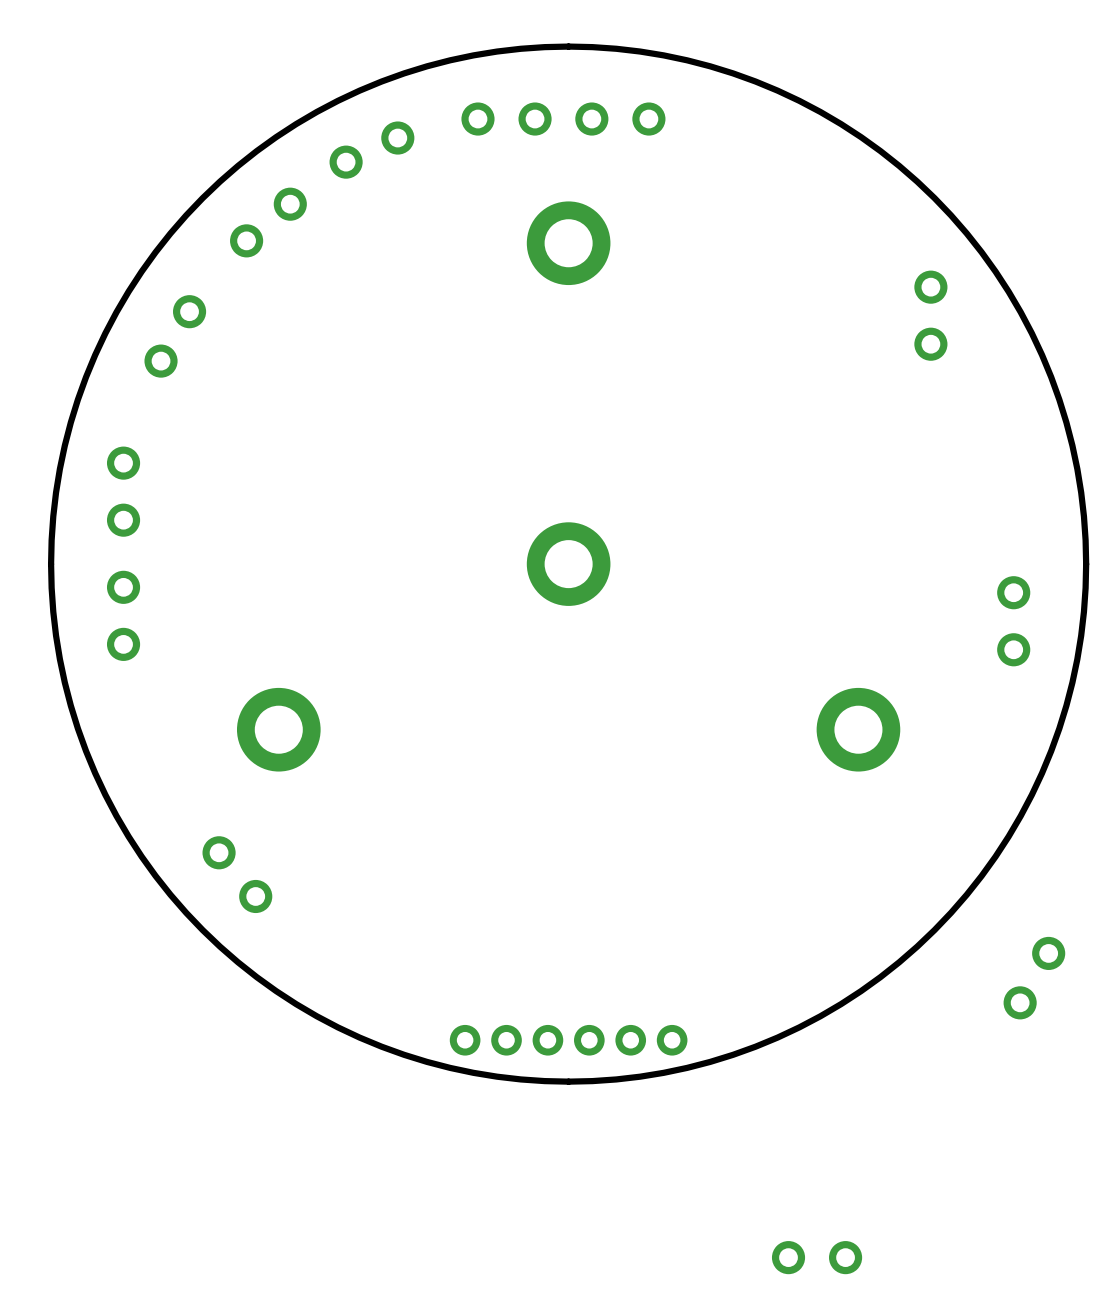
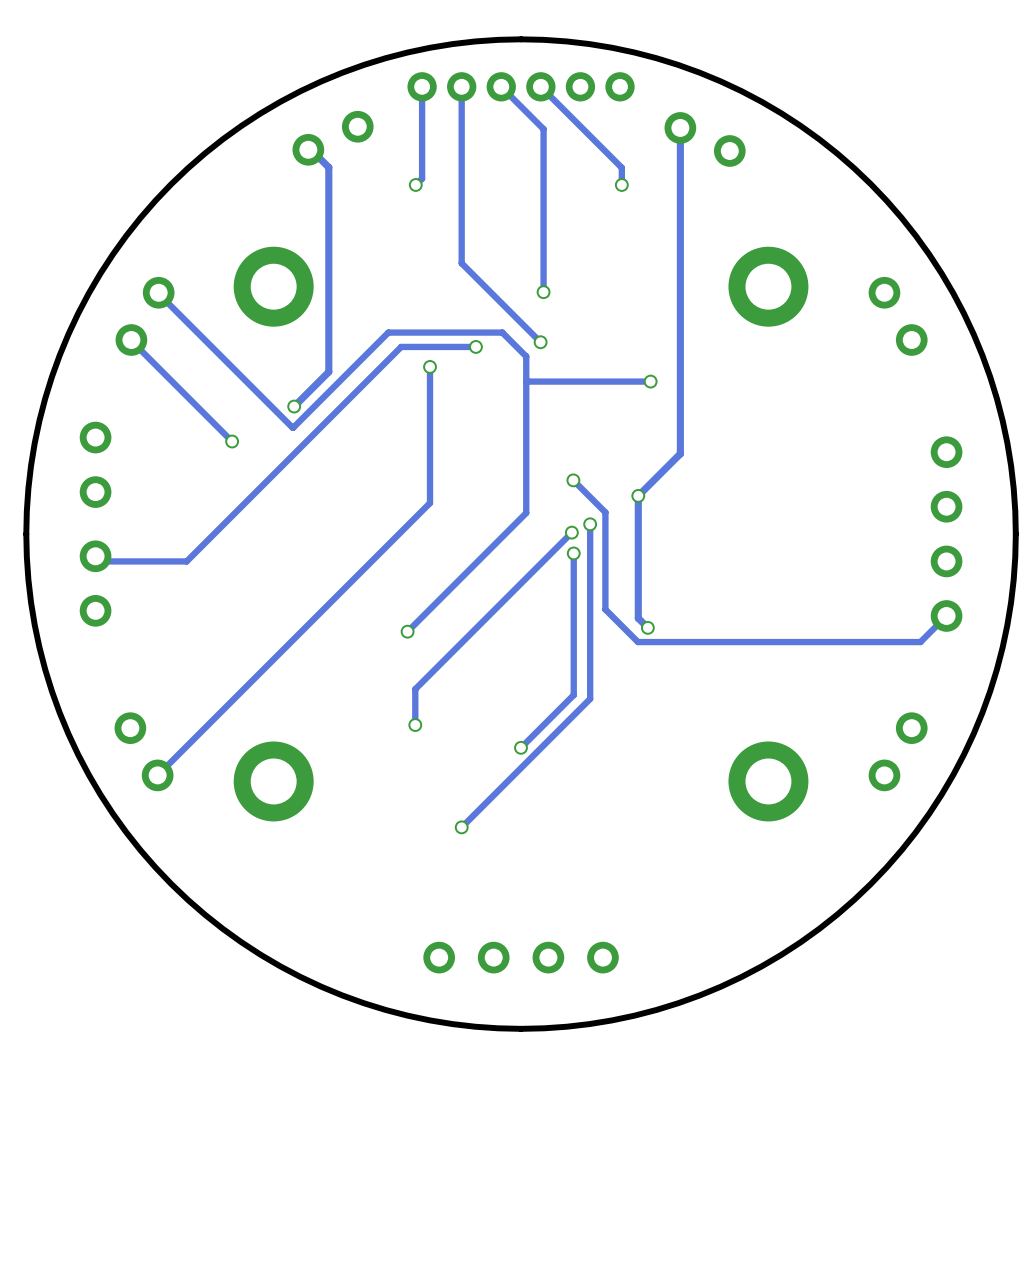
track: none -> (422, 86) (422, 178) (415, 184)
track: none -> (461, 86) (461, 263) (540, 342)
track: none -> (501, 86) (543, 129) (543, 292)
part: none -> (521, 86)
track: none -> (540, 86) (621, 167) (621, 184)
part: (506, 119) -> none
part: (620, 119) -> none
track: none -> (680, 127) (680, 453) (638, 495) (638, 618) (647, 627)
part: none -> (705, 139)
track: none -> (312, 150) (328, 167) (328, 371) (294, 406)
via: none -> (415, 184)
via: none -> (621, 184)
part: (268, 222) -> none
part: (568, 243) -> none
part: none -> (273, 286)
part: none -> (768, 286)
track: none -> (157, 292) (292, 427) (388, 332) (502, 332) (526, 356) (526, 513) (407, 631)
via: none -> (543, 292)
part position: (930, 315) -> (946, 479)
part: none -> (898, 316)
track: none -> (130, 340) (232, 441)
via: none -> (540, 342)
track: none -> (475, 346) (401, 346) (186, 561) (95, 561)
via: none -> (475, 346)
track: none -> (430, 366) (430, 503) (157, 775)
via: none -> (430, 366)
track: none -> (650, 381) (526, 381)
via: none -> (650, 381)
via: none -> (294, 406)
via: none -> (232, 441)
track: none -> (573, 480) (605, 512) (605, 609) (637, 642) (920, 642) (946, 615)
via: none -> (573, 480)
via: none -> (638, 495)
track: none -> (590, 524) (590, 698) (461, 827)
via: none -> (590, 524)
track: none -> (571, 532) (415, 689) (415, 725)
via: none -> (571, 532)
part: (568, 564) -> none
track: none -> (573, 553) (573, 695) (520, 747)
via: none -> (573, 553)
via: none -> (647, 627)
via: none -> (407, 631)
part position: (278, 729) -> (273, 781)
part position: (858, 729) -> (768, 781)
via: none -> (415, 725)
via: none -> (520, 747)
part: none -> (144, 751)
via: none -> (461, 827)
part: (237, 874) -> none
part position: (1034, 978) -> (898, 751)
part: none -> (466, 957)
part: none -> (575, 957)
part: (568, 1040) -> none
part: (817, 1257) -> none

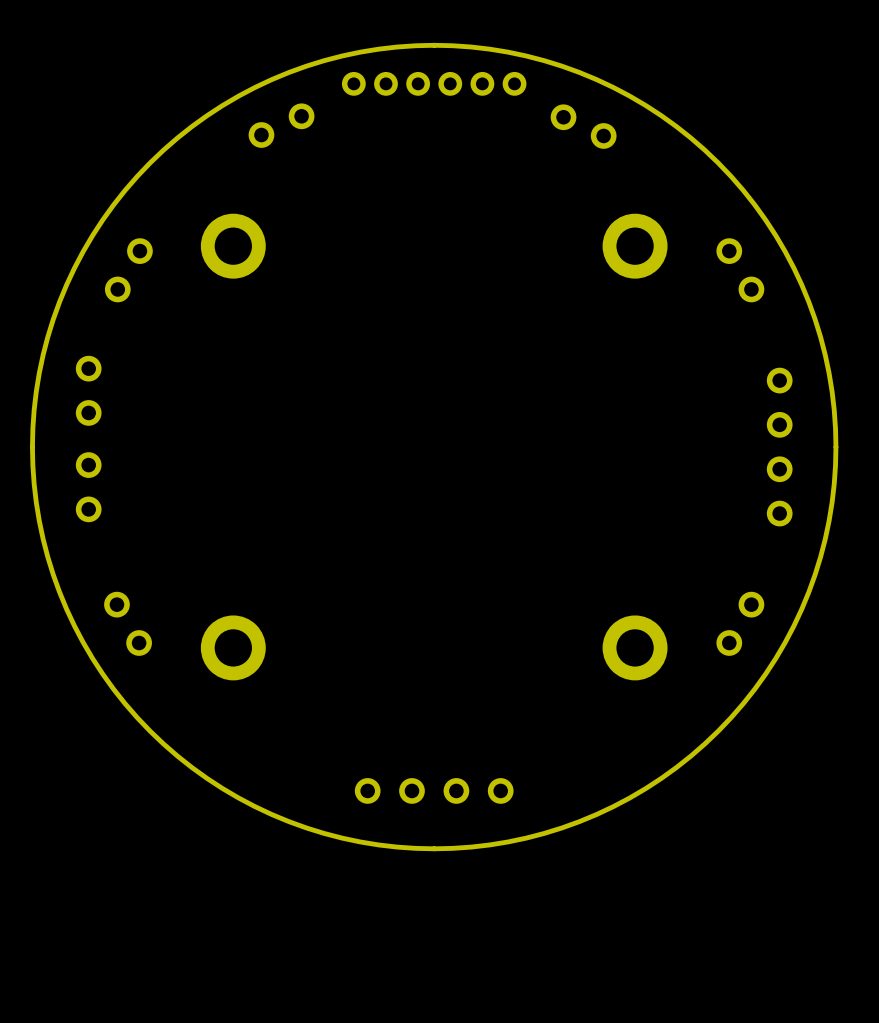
track: (422, 86) (422, 178) (415, 184) -> none
track: (461, 86) (461, 263) (540, 342) -> none
track: (501, 86) (543, 129) (543, 292) -> none
track: (540, 86) (621, 167) (621, 184) -> none
track: (680, 127) (680, 453) (638, 495) (638, 618) (647, 627) -> none
track: (312, 150) (328, 167) (328, 371) (294, 406) -> none
via: (415, 184) -> none
via: (621, 184) -> none
track: (157, 292) (292, 427) (388, 332) (502, 332) (526, 356) (526, 513) (407, 631) -> none
via: (543, 292) -> none
track: (130, 340) (232, 441) -> none
via: (540, 342) -> none
track: (475, 346) (401, 346) (186, 561) (95, 561) -> none
via: (475, 346) -> none
track: (430, 366) (430, 503) (157, 775) -> none
via: (430, 366) -> none
track: (650, 381) (526, 381) -> none
via: (650, 381) -> none
via: (294, 406) -> none
via: (232, 441) -> none
track: (573, 480) (605, 512) (605, 609) (637, 642) (920, 642) (946, 615) -> none
via: (573, 480) -> none
via: (638, 495) -> none
track: (590, 524) (590, 698) (461, 827) -> none
via: (590, 524) -> none
track: (571, 532) (415, 689) (415, 725) -> none
via: (571, 532) -> none
track: (573, 553) (573, 695) (520, 747) -> none
via: (573, 553) -> none
via: (647, 627) -> none
via: (407, 631) -> none
via: (415, 725) -> none
via: (520, 747) -> none
via: (461, 827) -> none

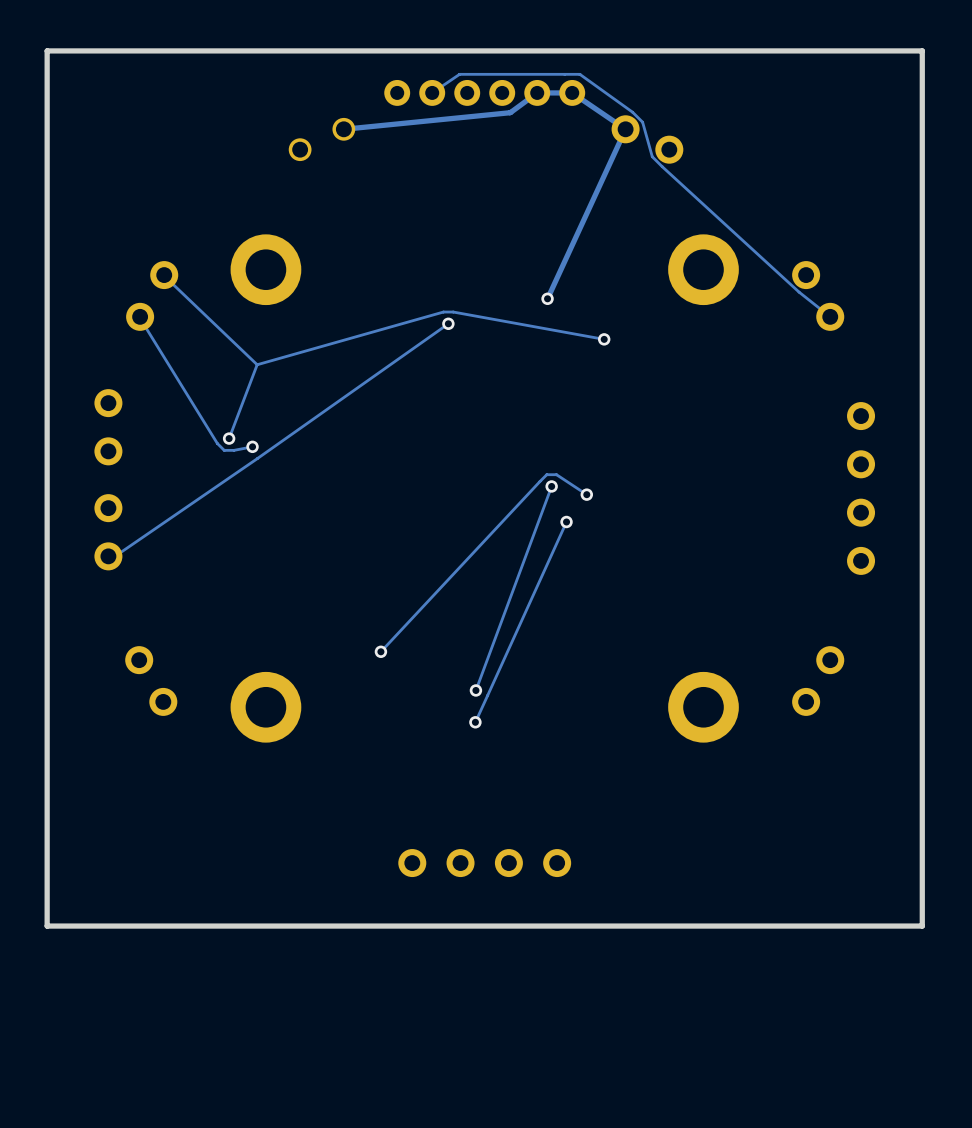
board edge: (434, 45) (397, 47) (360, 52) (324, 60) (289, 72) (255, 87) (222, 105) (192, 126) (150, 162) (125, 190) (102, 220) (83, 251) (66, 284) (47, 337) (39, 373) (34, 409) (32, 447) (34, 484) (39, 520) (47, 556) (59, 592) (83, 642) (102, 674) (125, 703) (150, 731) (177, 756) (207, 778) (238, 798) (289, 821) (324, 833) (360, 841) (397, 847) (434, 848) (471, 847) (508, 841) (544, 833) (579, 821) (629, 798) (661, 778) (690, 756) (718, 731) (743, 703) (765, 674) (785, 642) (801, 609) (815, 574) (829, 520) (834, 484) (835, 447) (834, 409) (829, 373) (820, 337) (808, 301) (793, 267) (775, 235) (754, 204) (718, 162) (690, 137) (661, 115) (629, 96) (596, 79) (561, 66) (508, 52) (471, 47) (434, 45) -> (922, 50) (922, 926) (47, 926) (47, 50) (922, 50)
track: none -> (432, 92) (459, 74) (580, 74) (632, 112) (642, 122) (652, 156) (799, 292) (830, 316)
part footprint: [248, 103, 315, 148] -> [288, 117, 356, 162]
track: none -> (343, 129) (509, 112) (537, 92) (572, 92) (625, 129) (547, 298)
track: none -> (163, 275) (257, 364)
via: none -> (547, 298)
track: none -> (139, 316) (217, 443) (224, 450) (252, 446)
track: none -> (448, 323) (108, 560)
via: none -> (448, 323)
track: none -> (604, 339) (453, 312) (443, 312) (257, 364)
via: none -> (604, 339)
track: none -> (257, 364) (229, 438)
via: none -> (229, 438)
via: none -> (252, 446)
track: none -> (551, 486) (475, 690)
via: none -> (551, 486)
track: none -> (586, 494) (556, 474) (546, 474) (380, 651)
via: none -> (586, 494)
track: none -> (566, 521) (475, 722)
via: none -> (566, 521)
via: none -> (380, 651)
via: none -> (475, 690)
via: none -> (475, 722)

